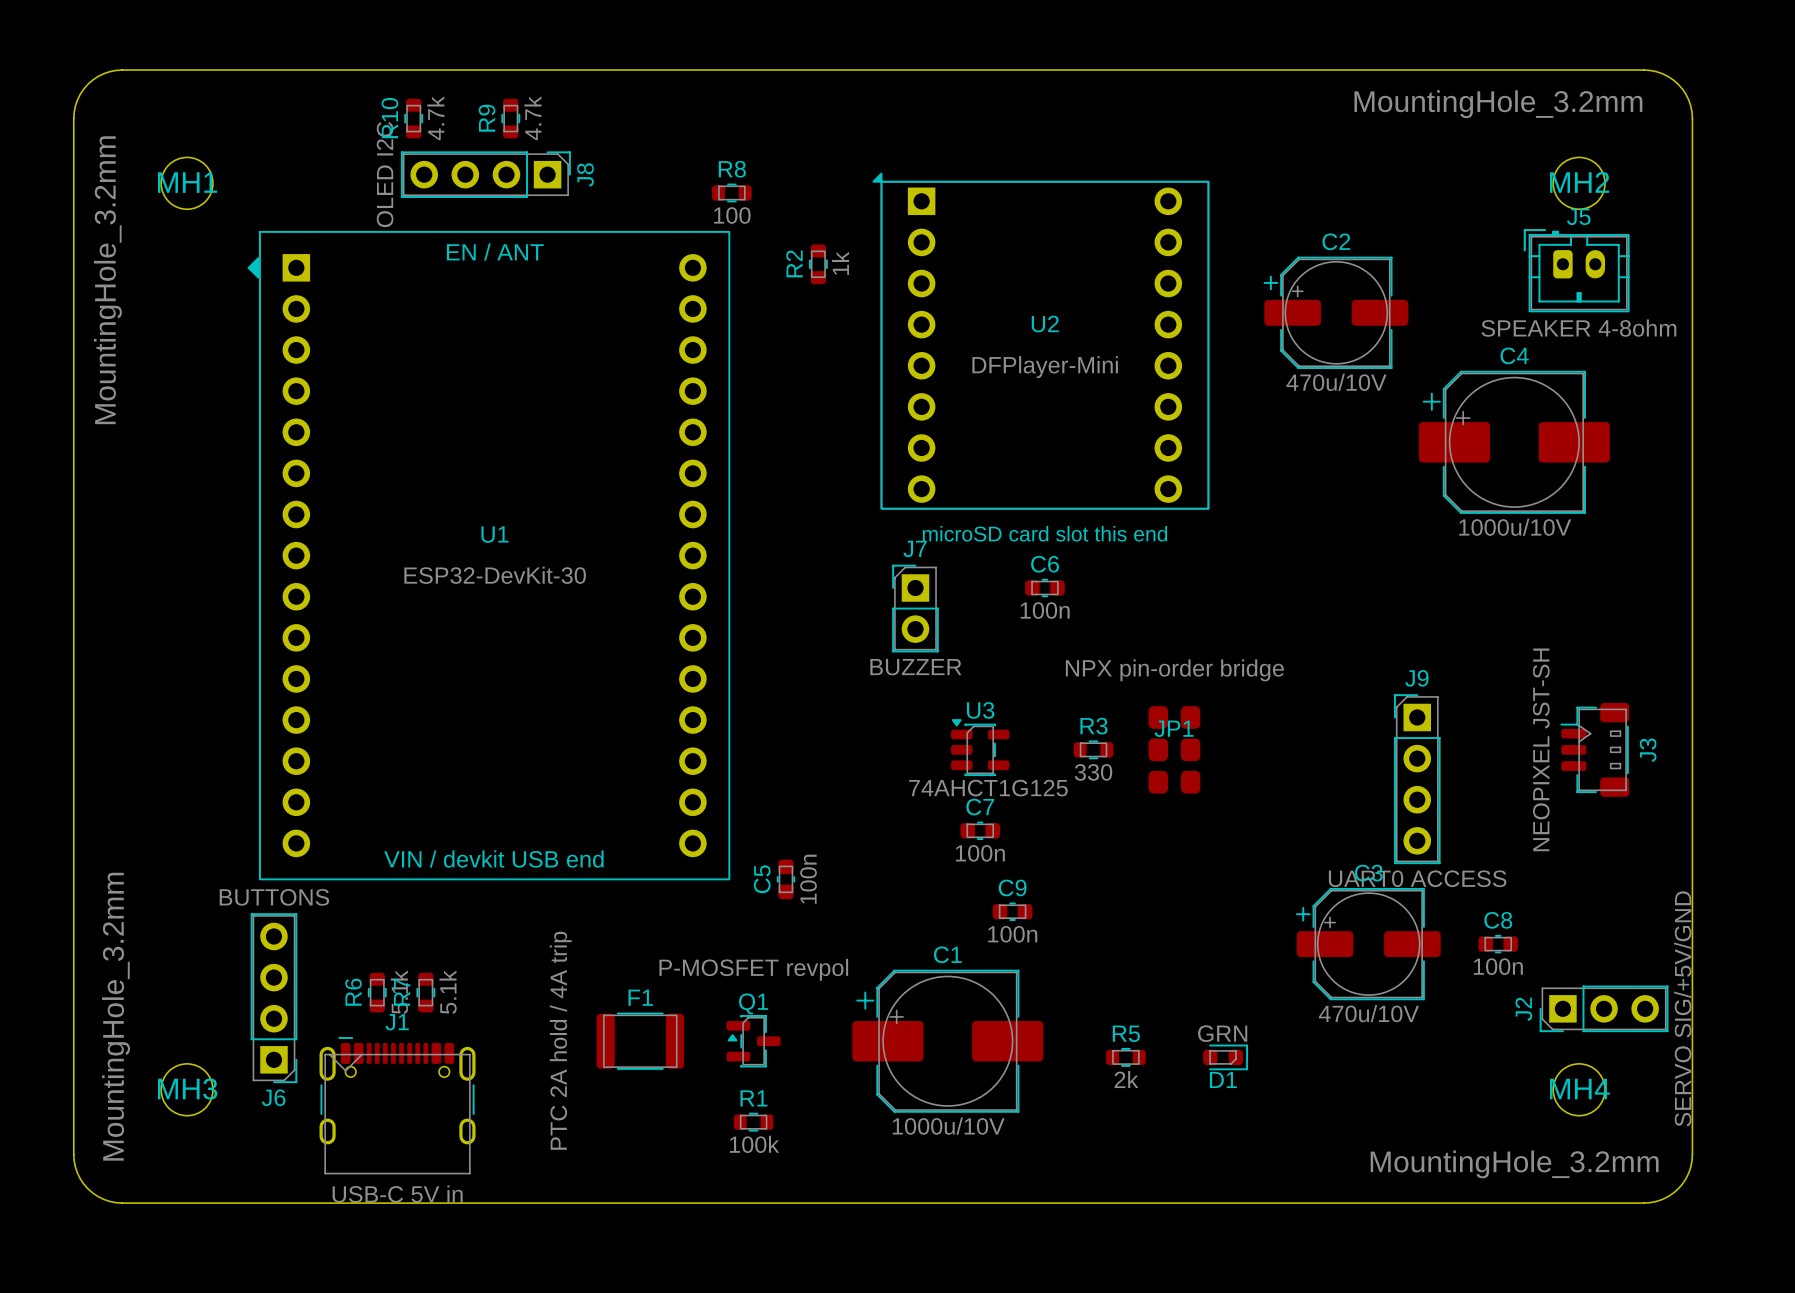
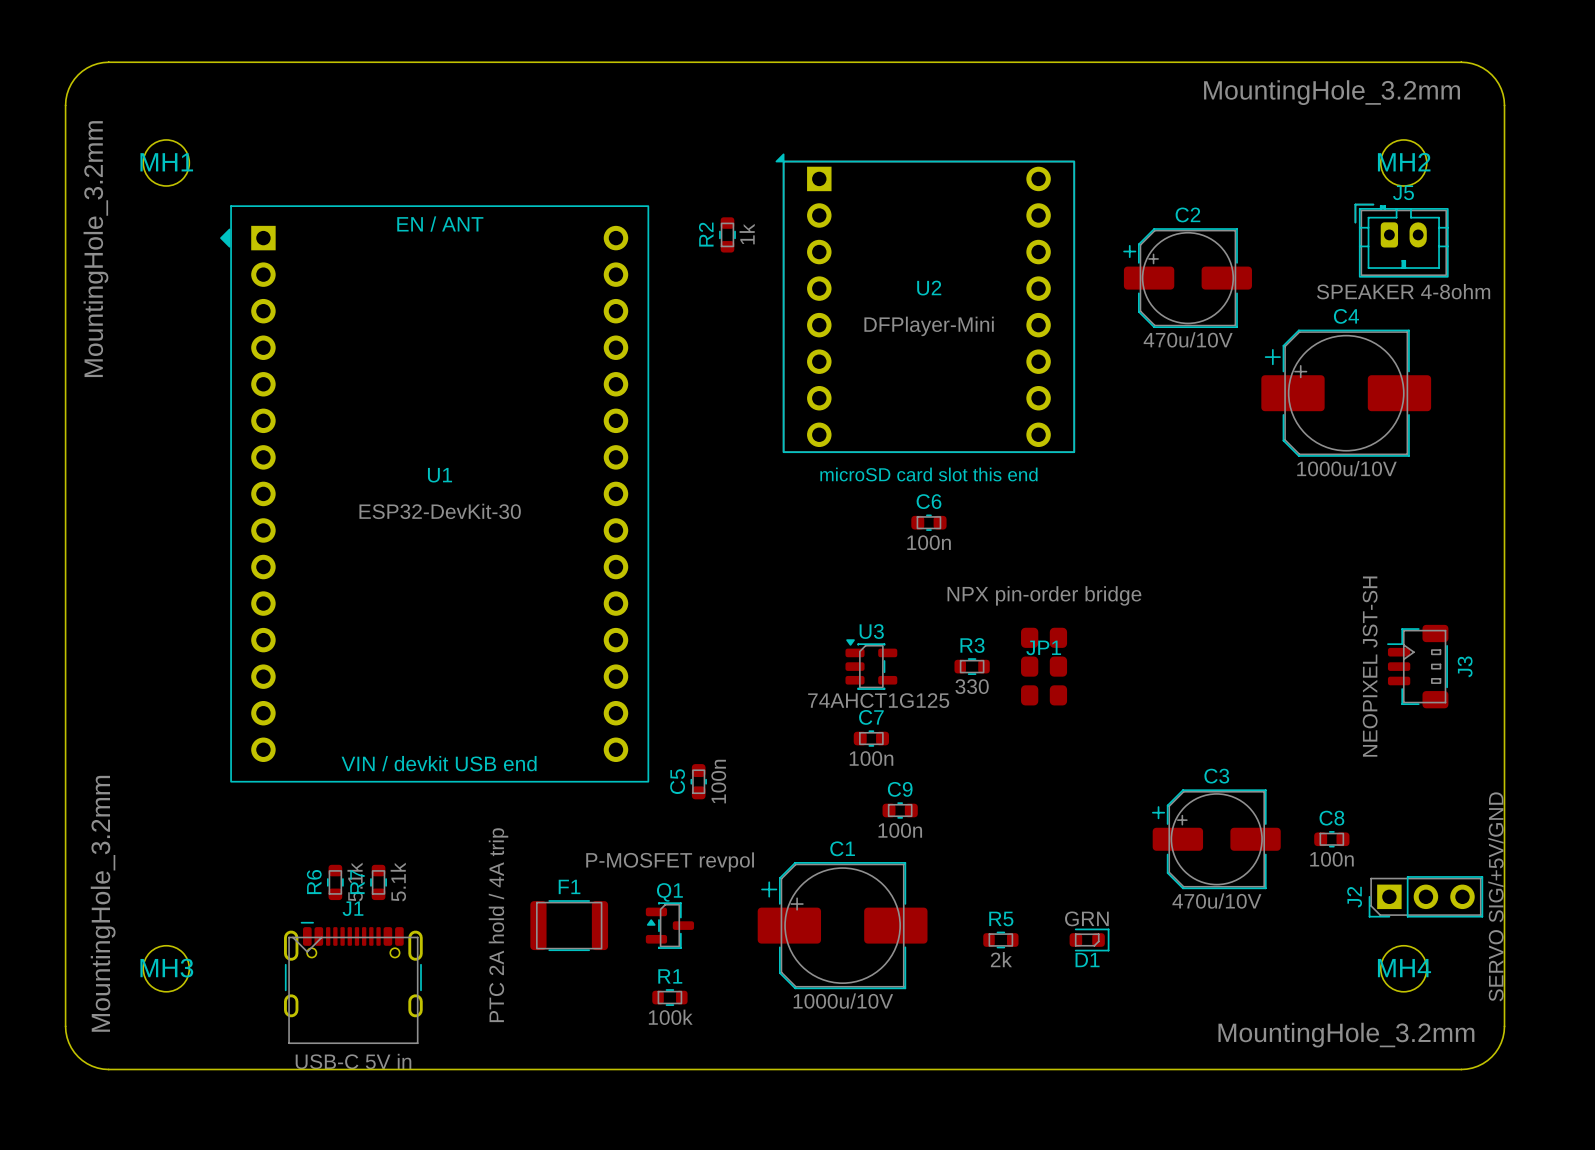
R10: 4.7k (413, 118) -> none
R9: 4.7k (510, 118) -> none
J8: OLED I2C (485, 174) -> none
R8: 100 (731, 192) -> none
J7: BUZZER (915, 608) -> none
J9: UART0 ACCESS (1417, 779) -> none
J6: BUTTONS (273, 998) -> none

